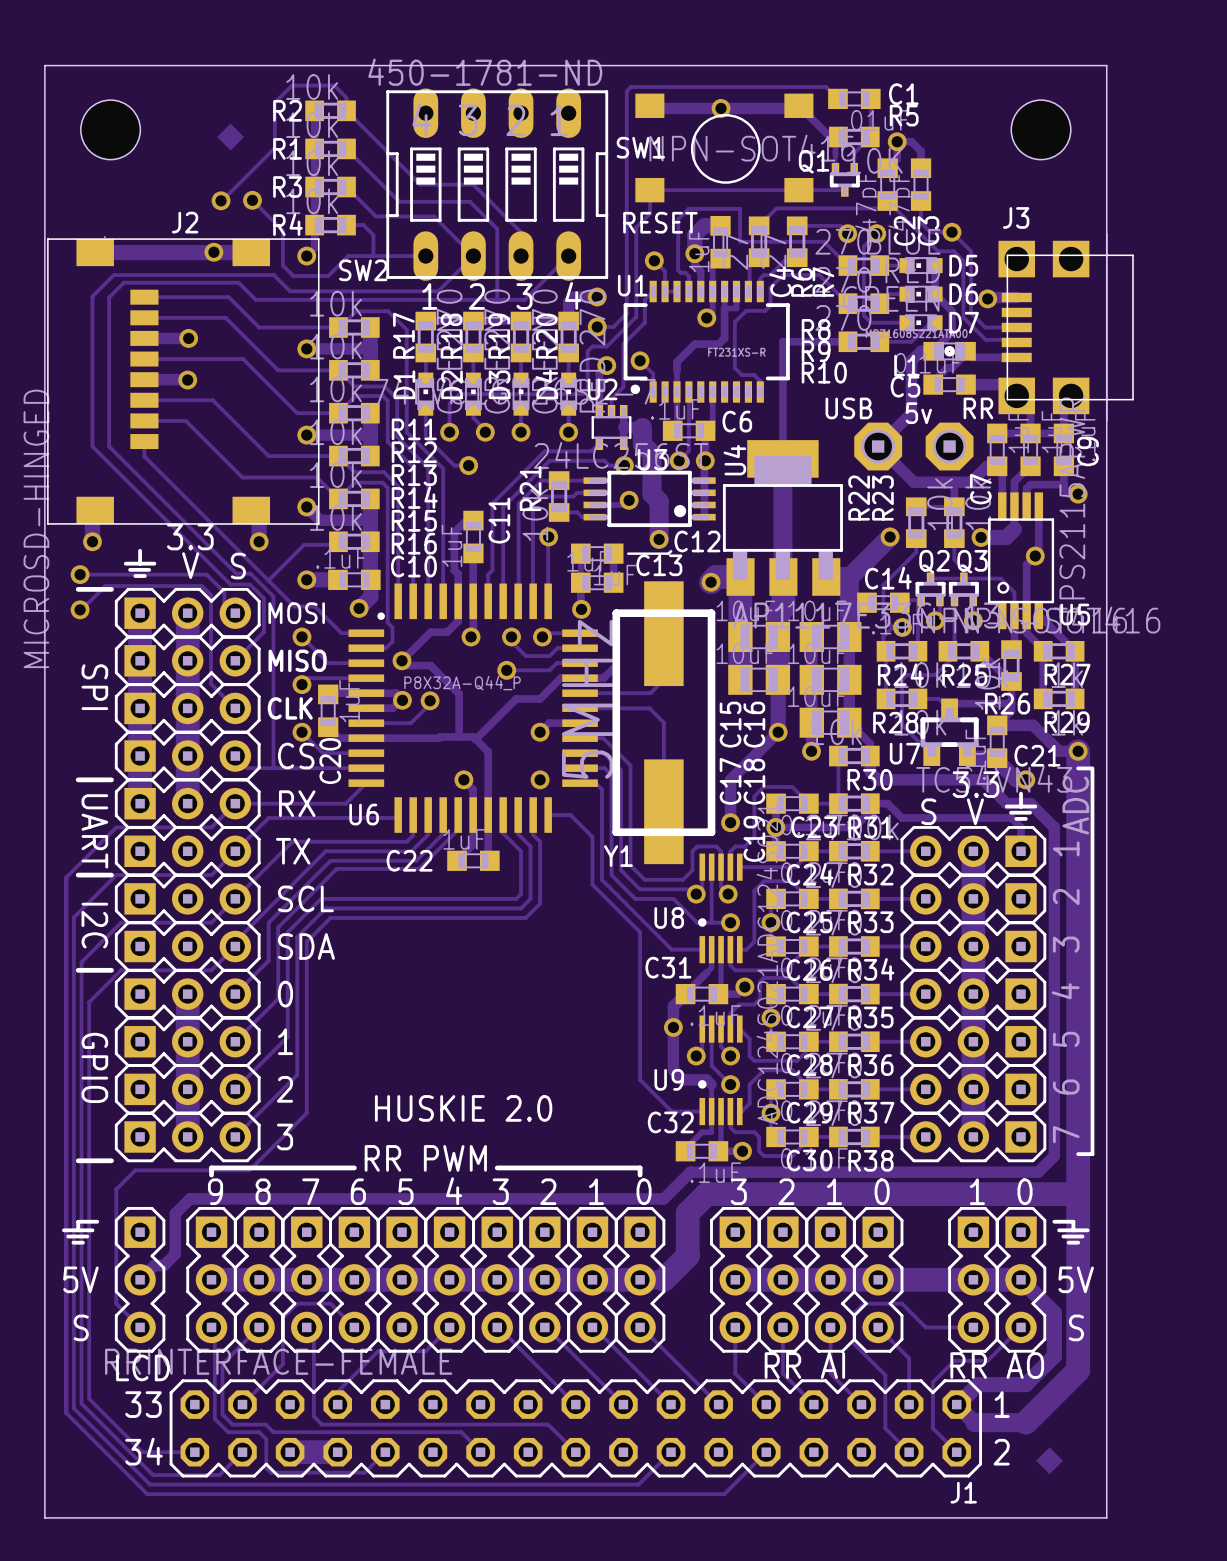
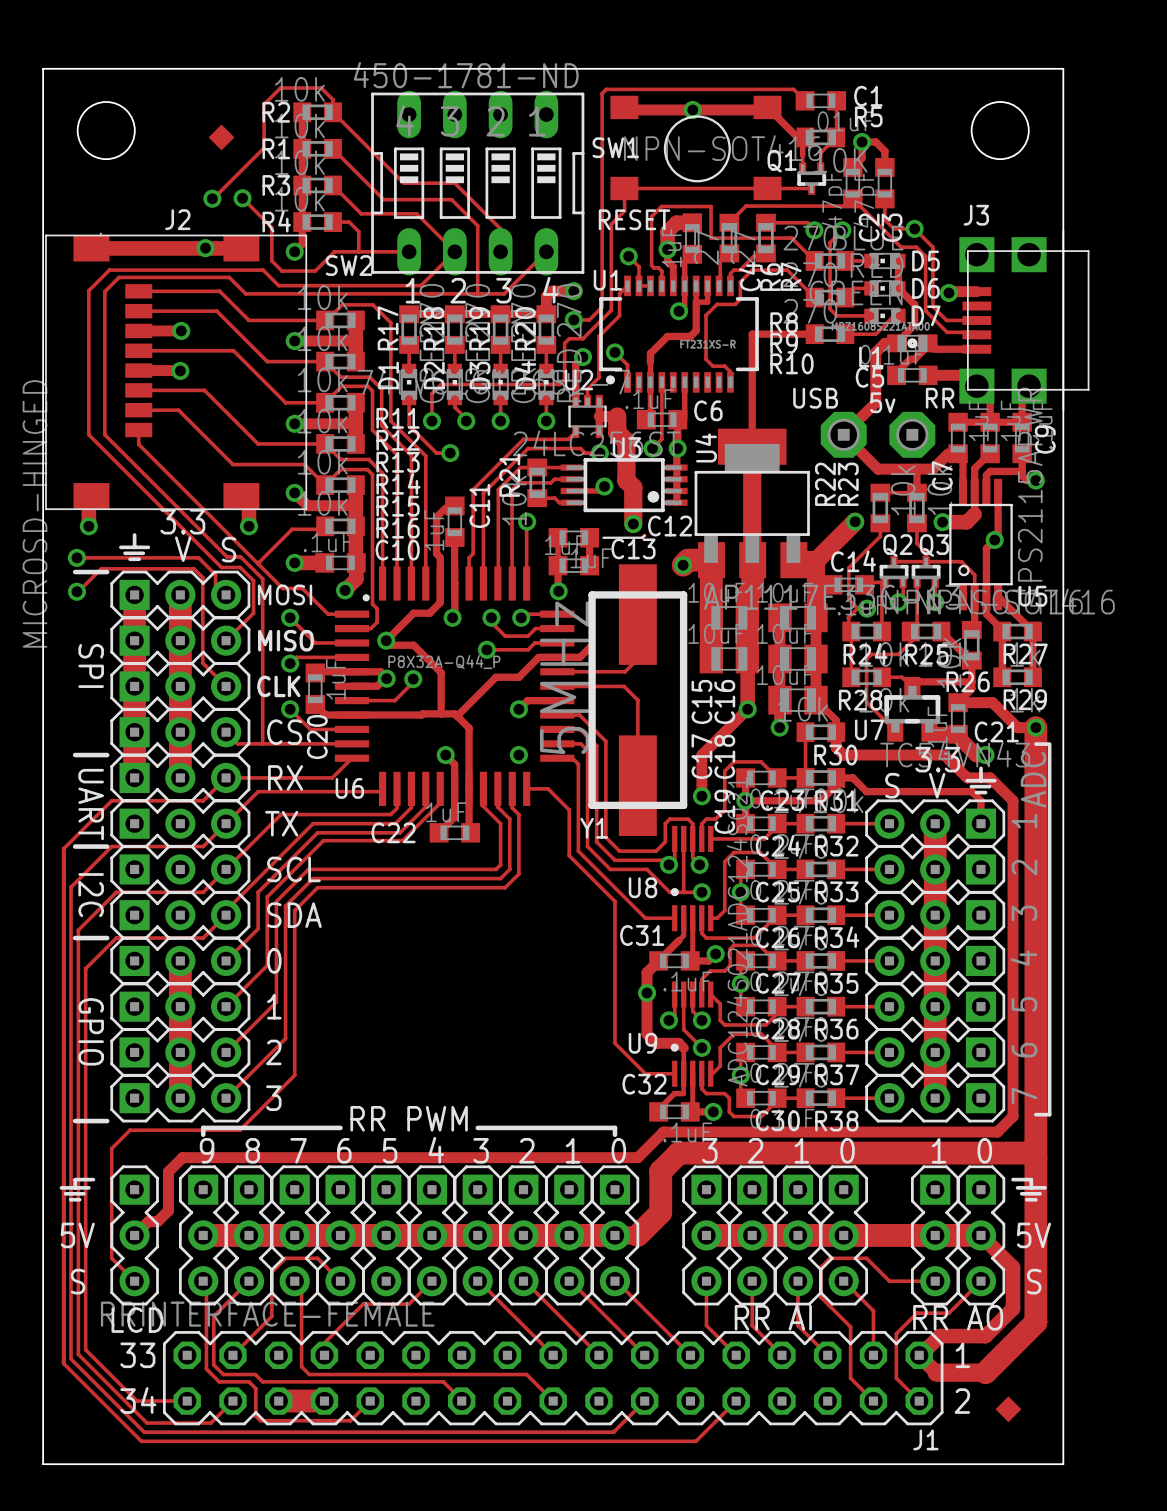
text: HUSKIE 2.0 (463, 1108) -> none

